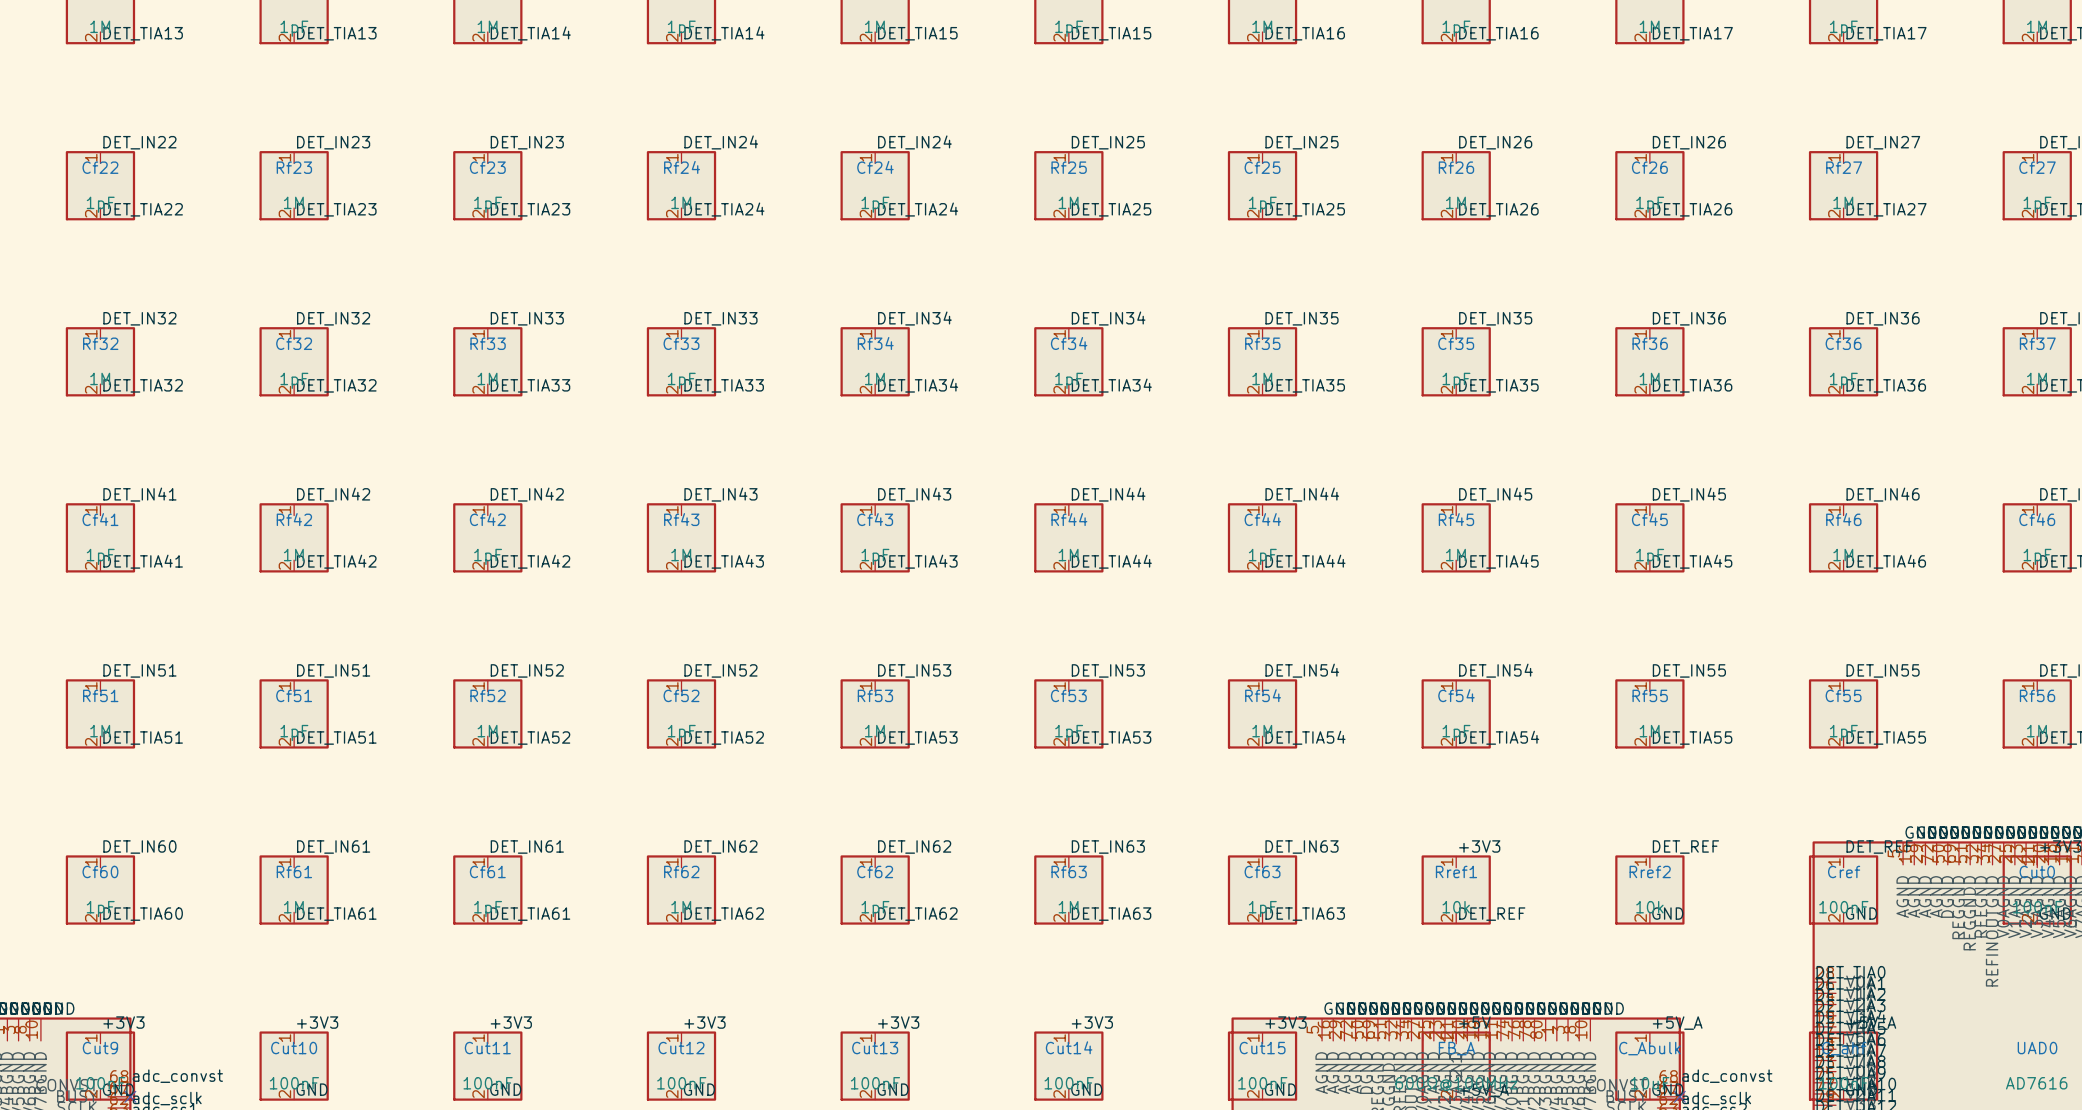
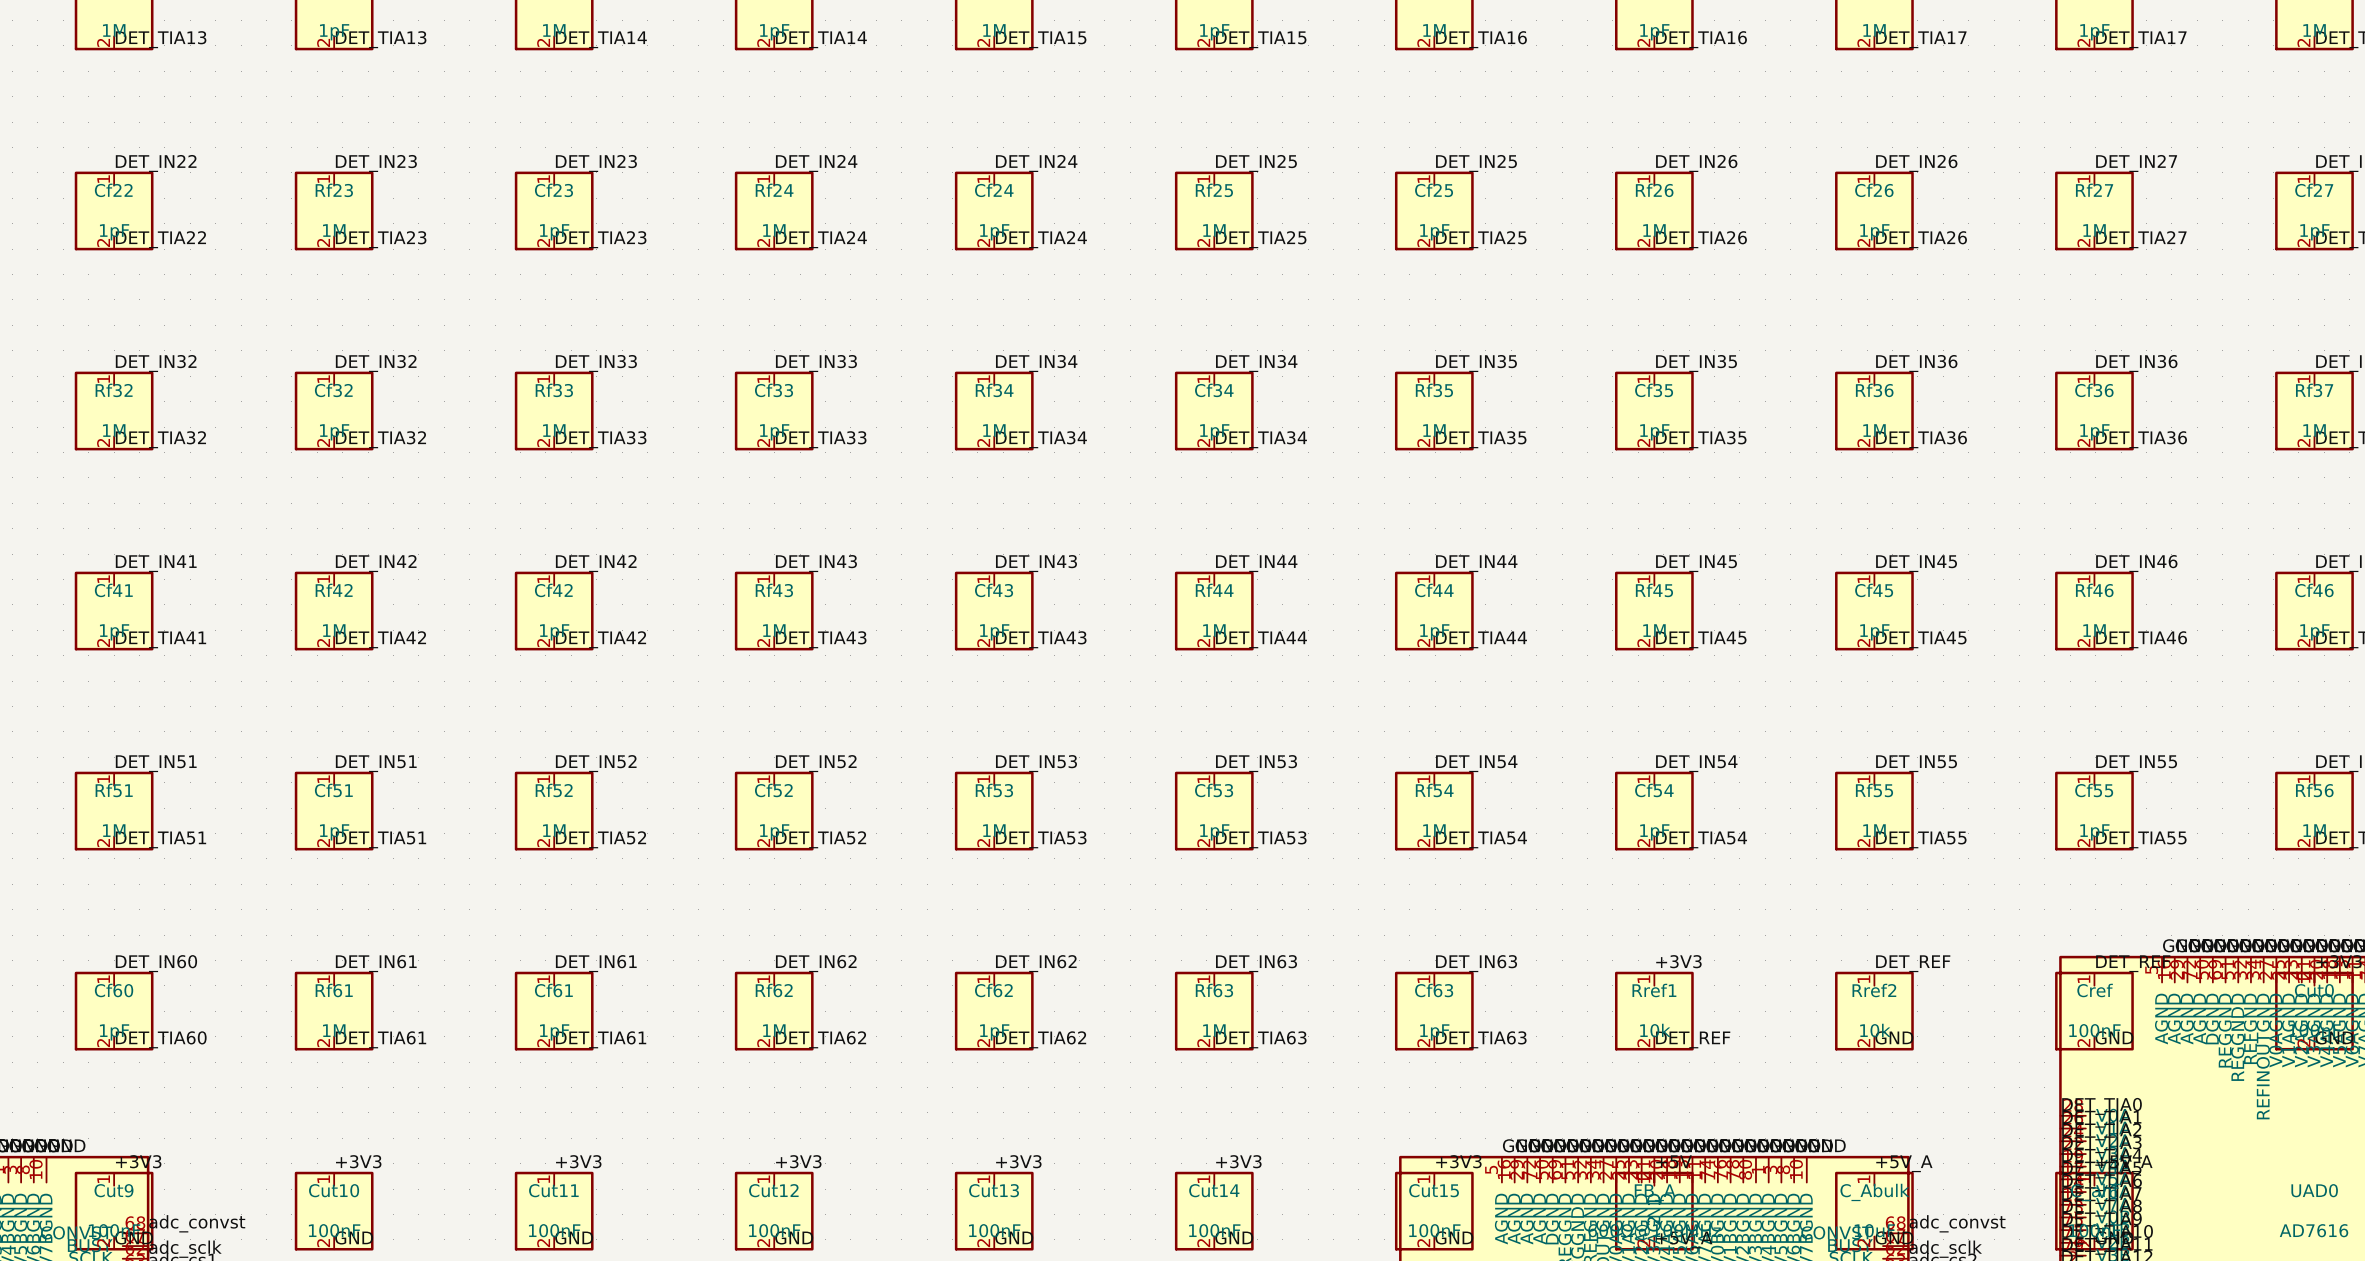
no-connect mark: (130, 1096) -> none
no-connect mark: (1679, 1096) -> none

